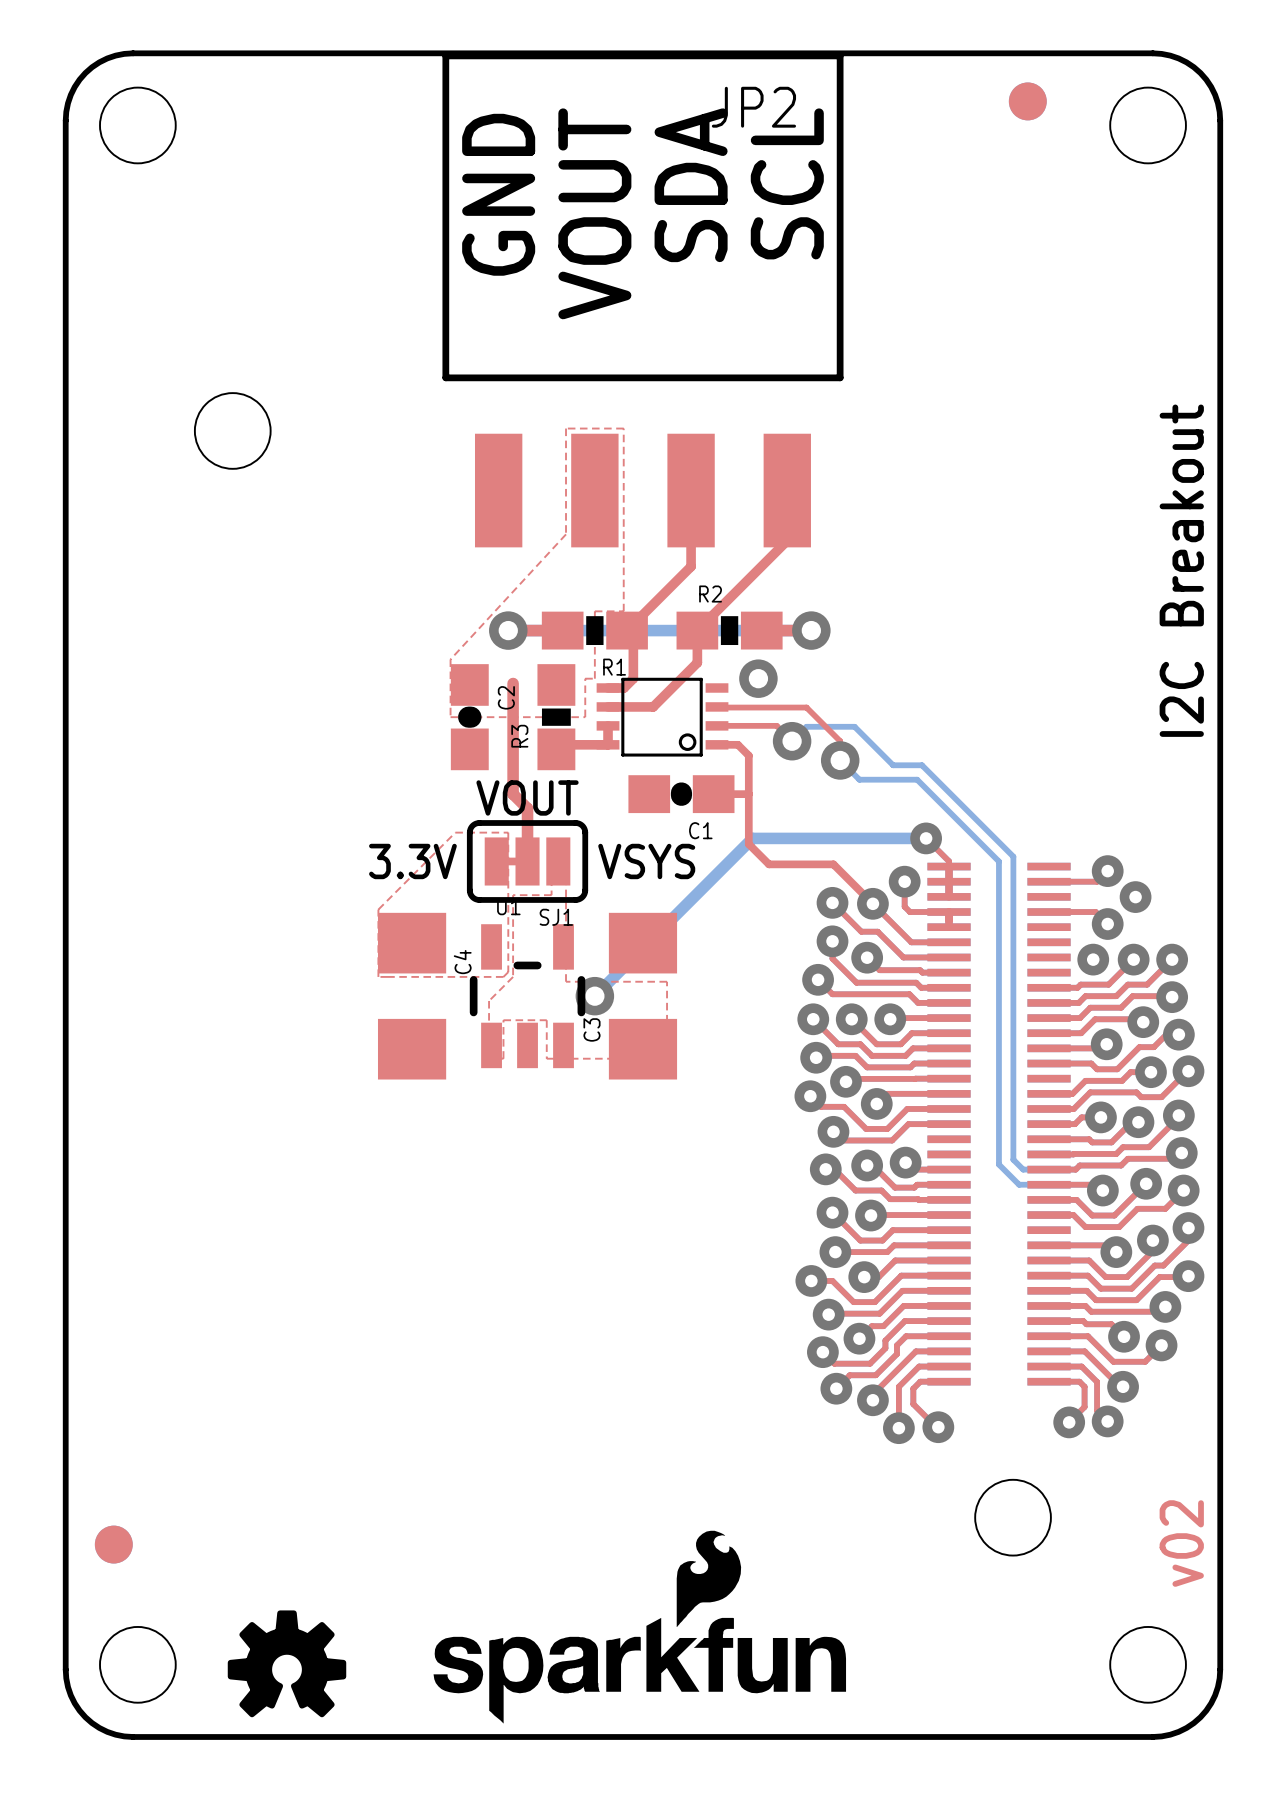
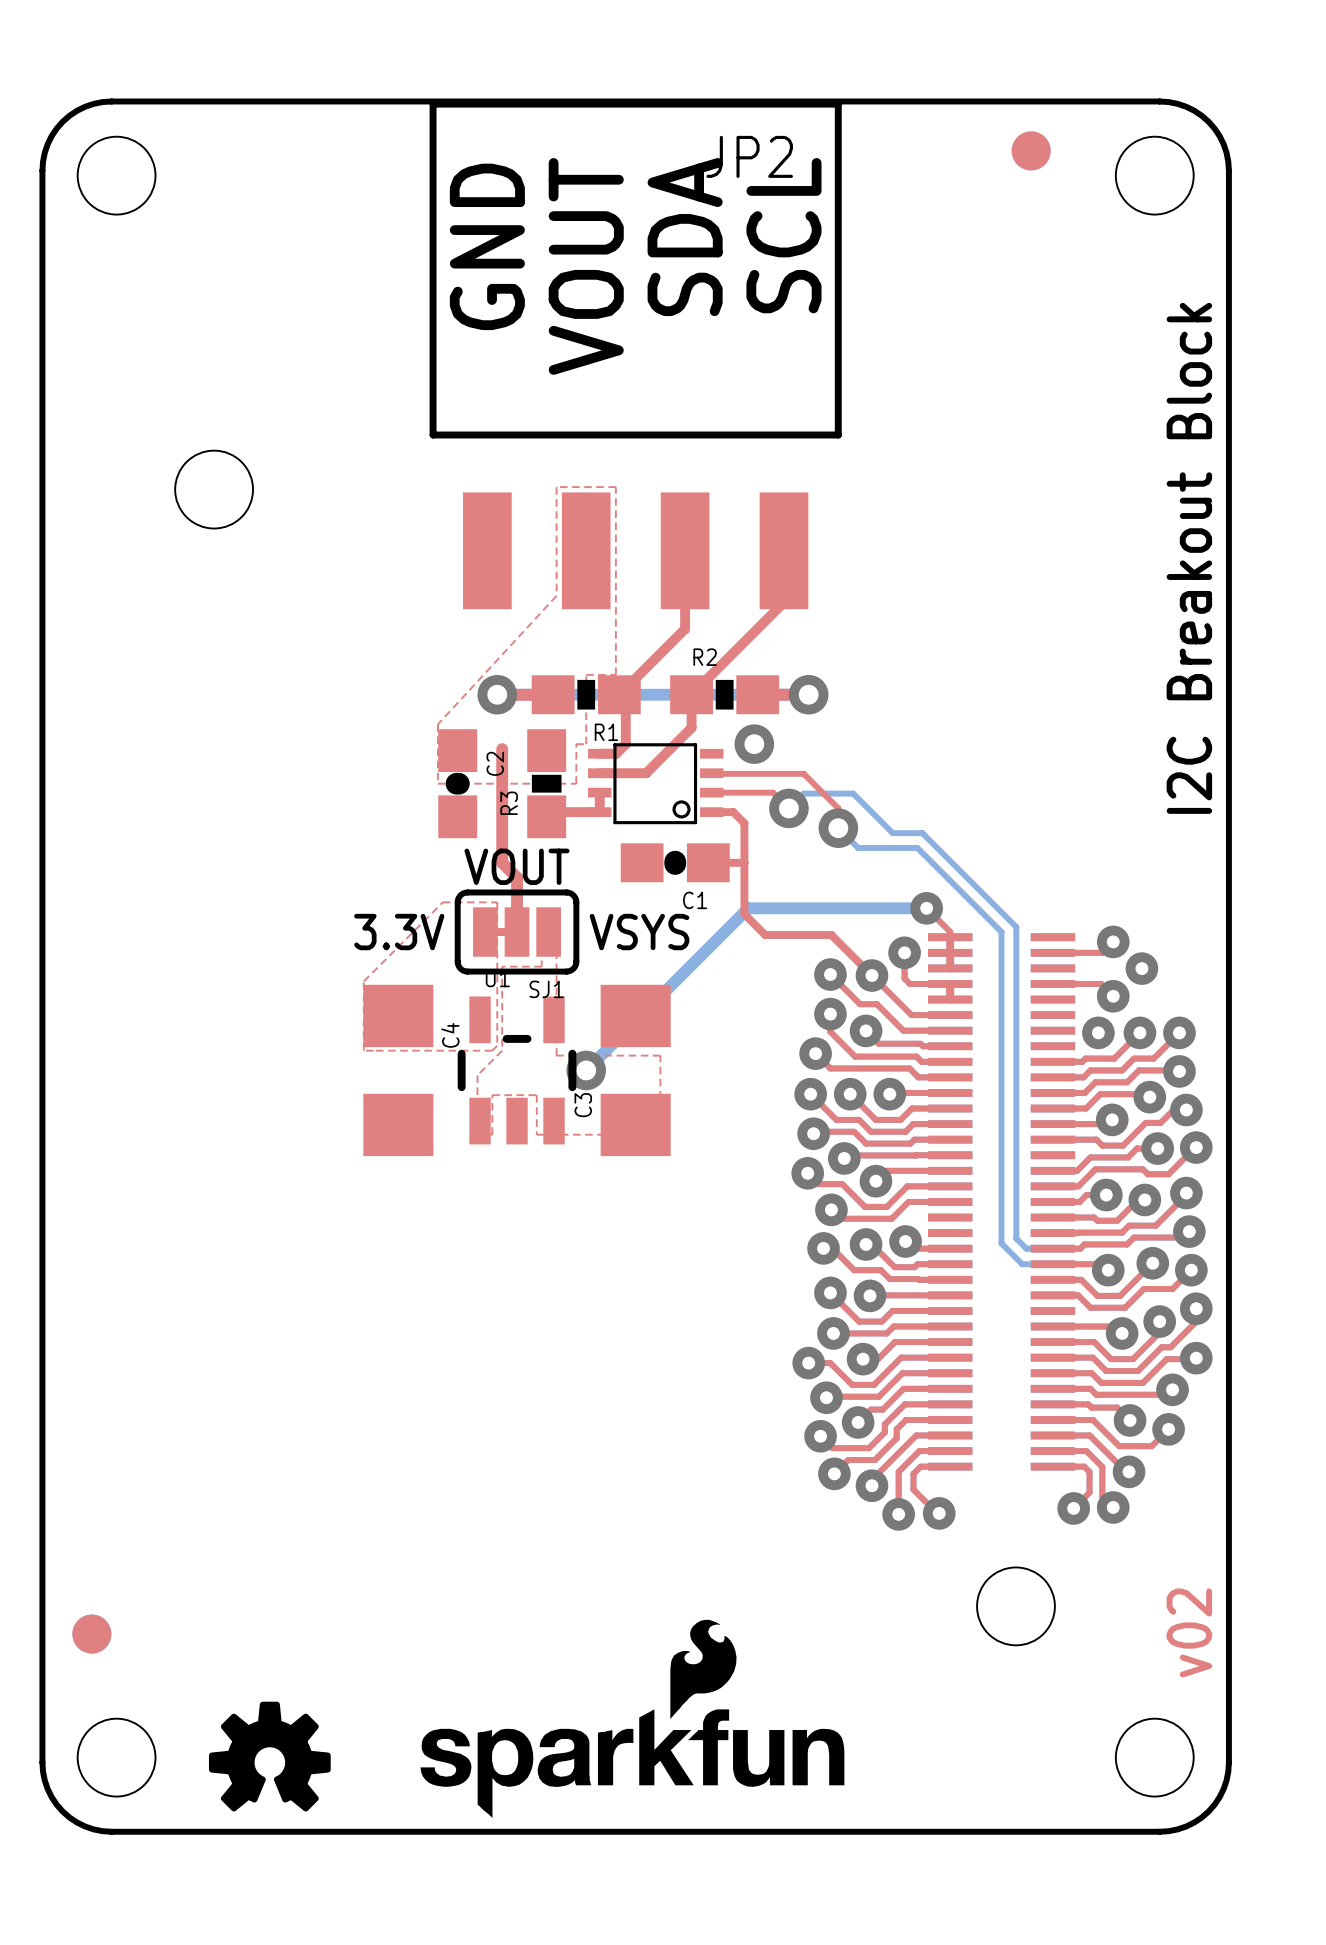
text: I2C Breakout (1181, 570) -> I2C Breakout Block (1189, 558)

